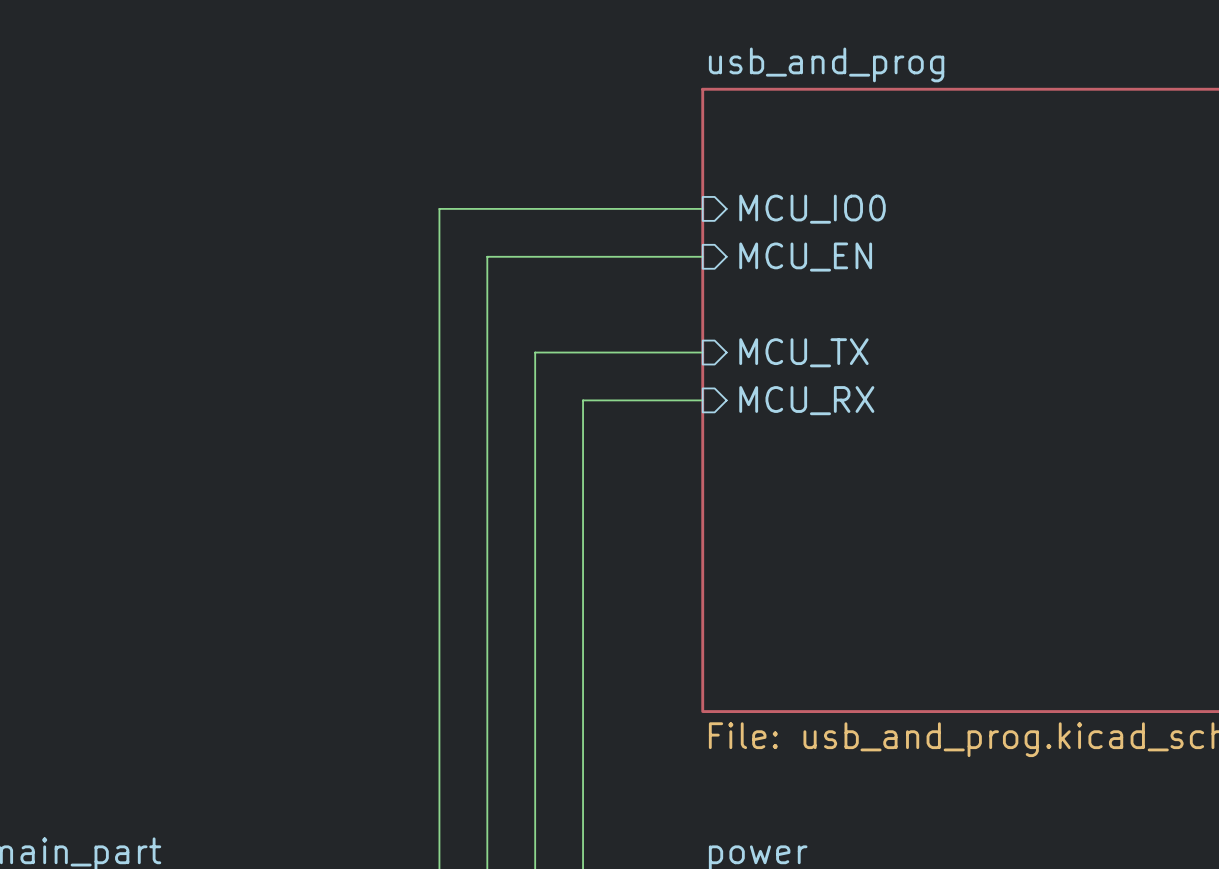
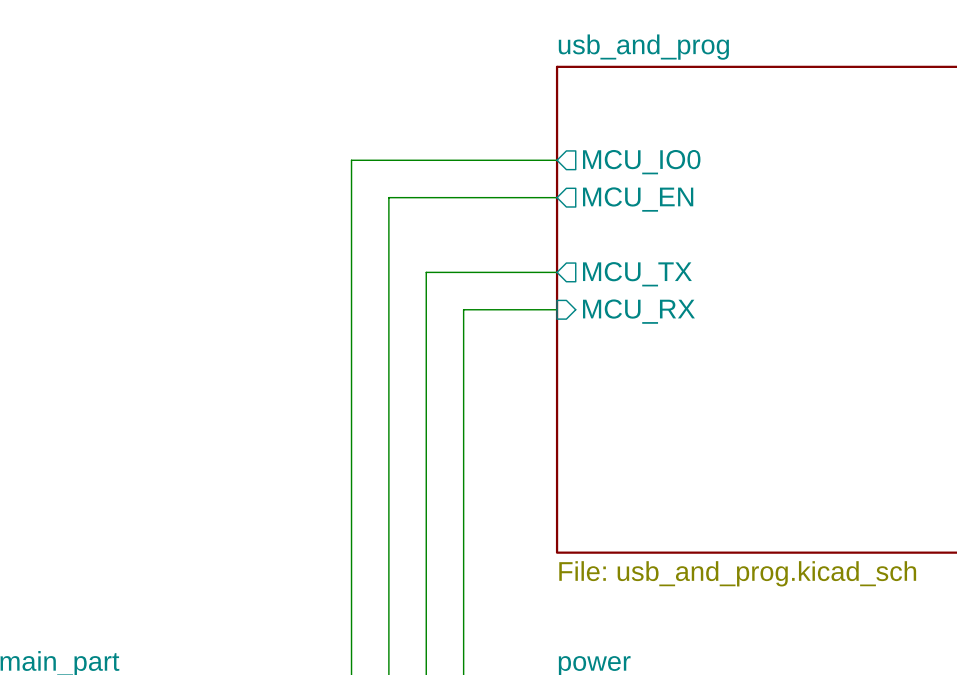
sheet pin shape: input (812, 209) -> output (641, 162)
sheet pin shape: input (805, 257) -> output (638, 199)
sheet pin shape: input (803, 352) -> output (637, 274)

